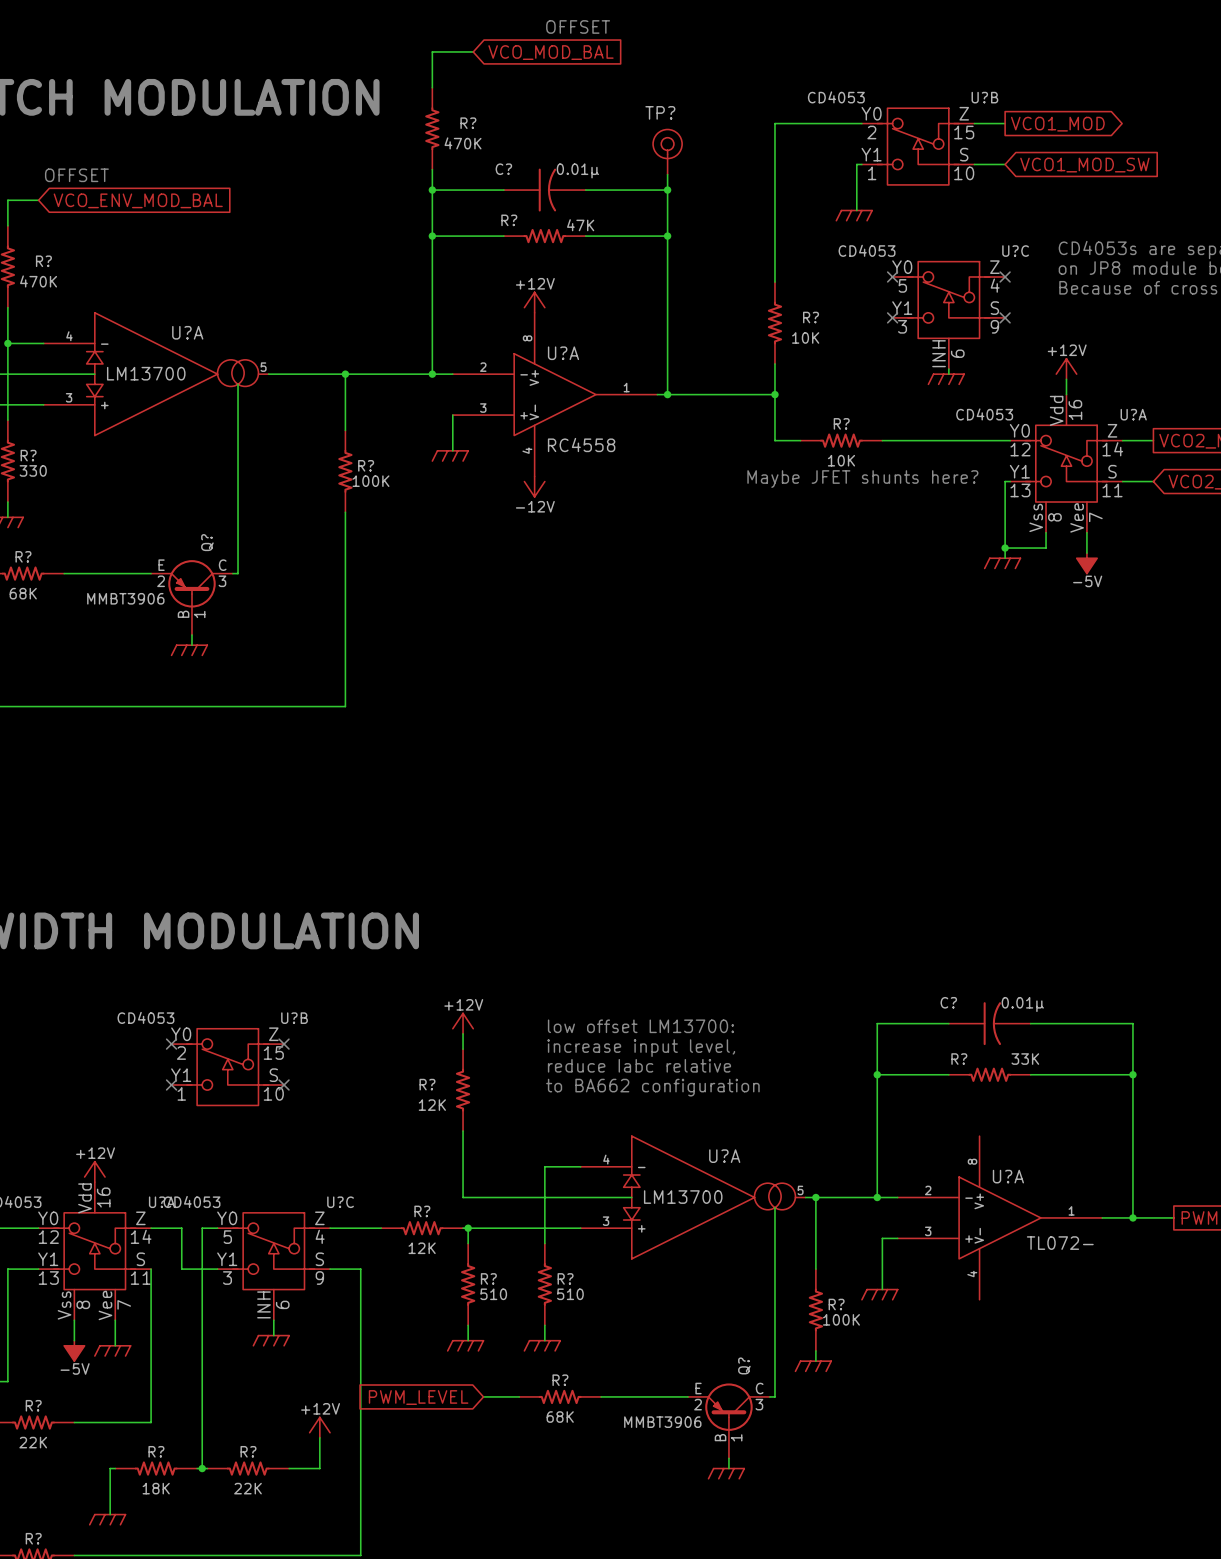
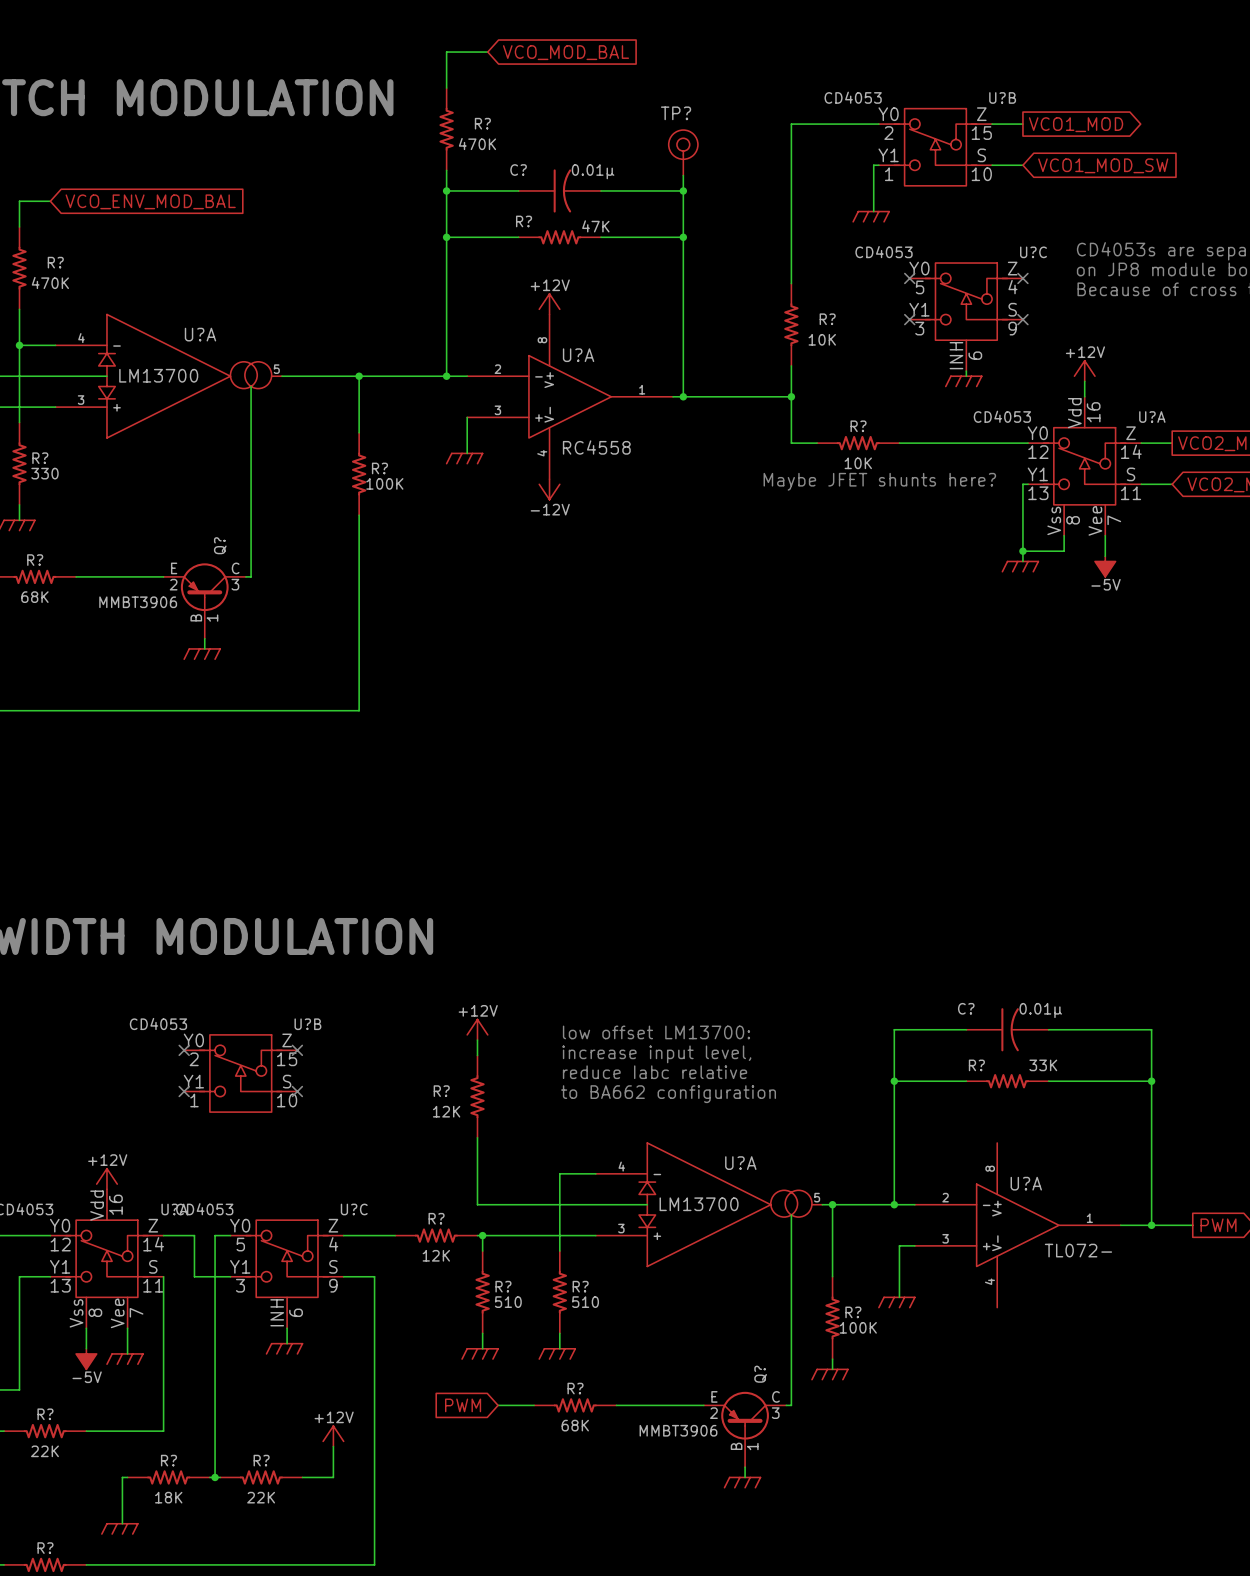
text: OFFSET (578, 26) -> none
text: OFFSET (76, 175) -> none
global label: PWM_LEVEL (418, 1397) -> PWM (463, 1405)

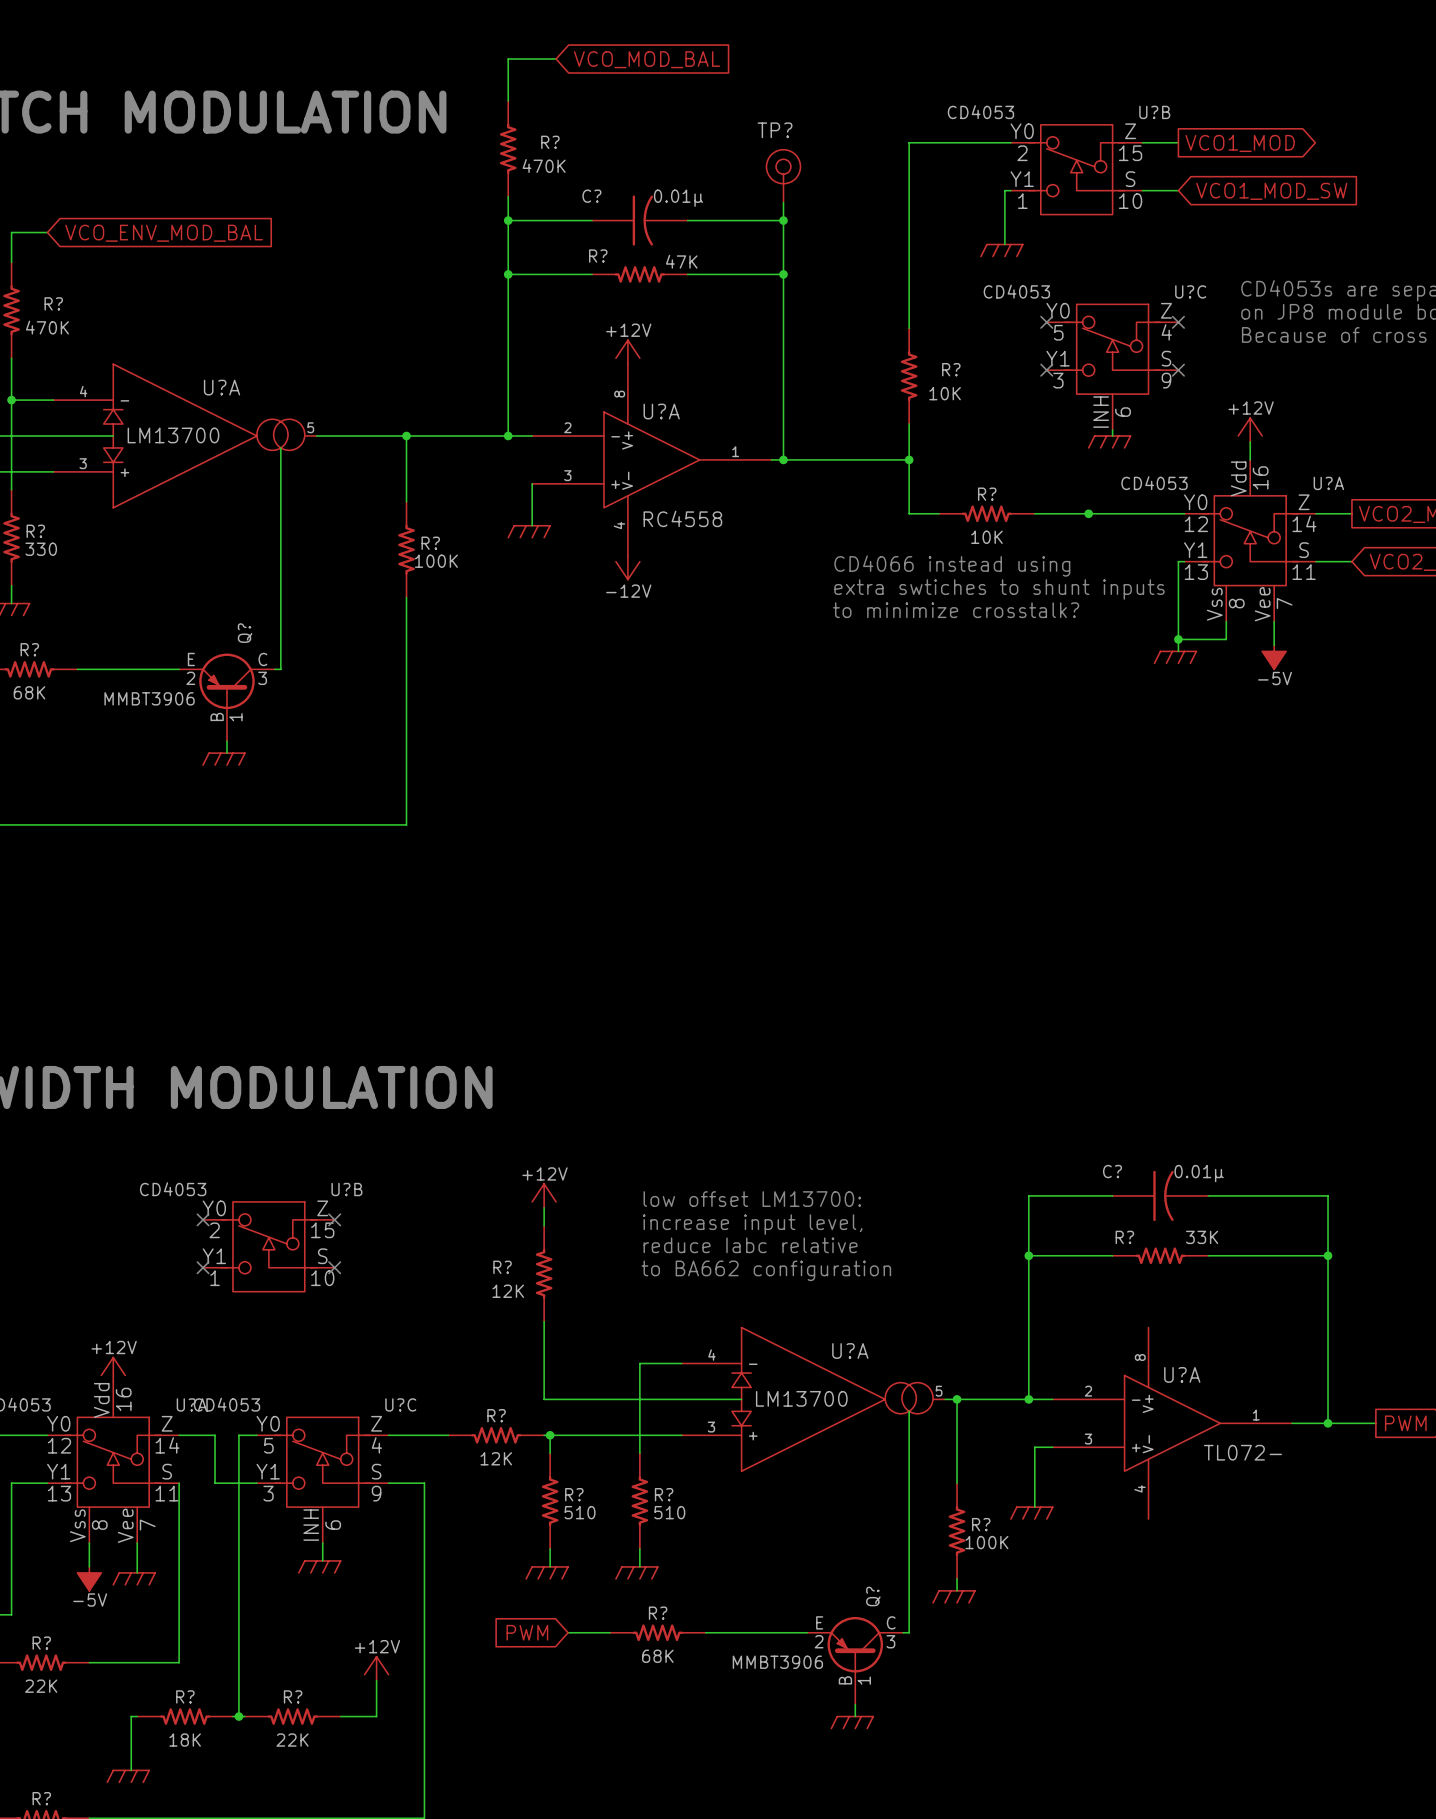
junction: none -> (1088, 513)
text: Maybe JFET shunts here? (879, 481) -> none
text: none -> CD4066 instead using (952, 566)
text: none -> extra swtiches to shunt inputs (999, 589)
text: none -> to minimize crosstalk? (956, 610)

